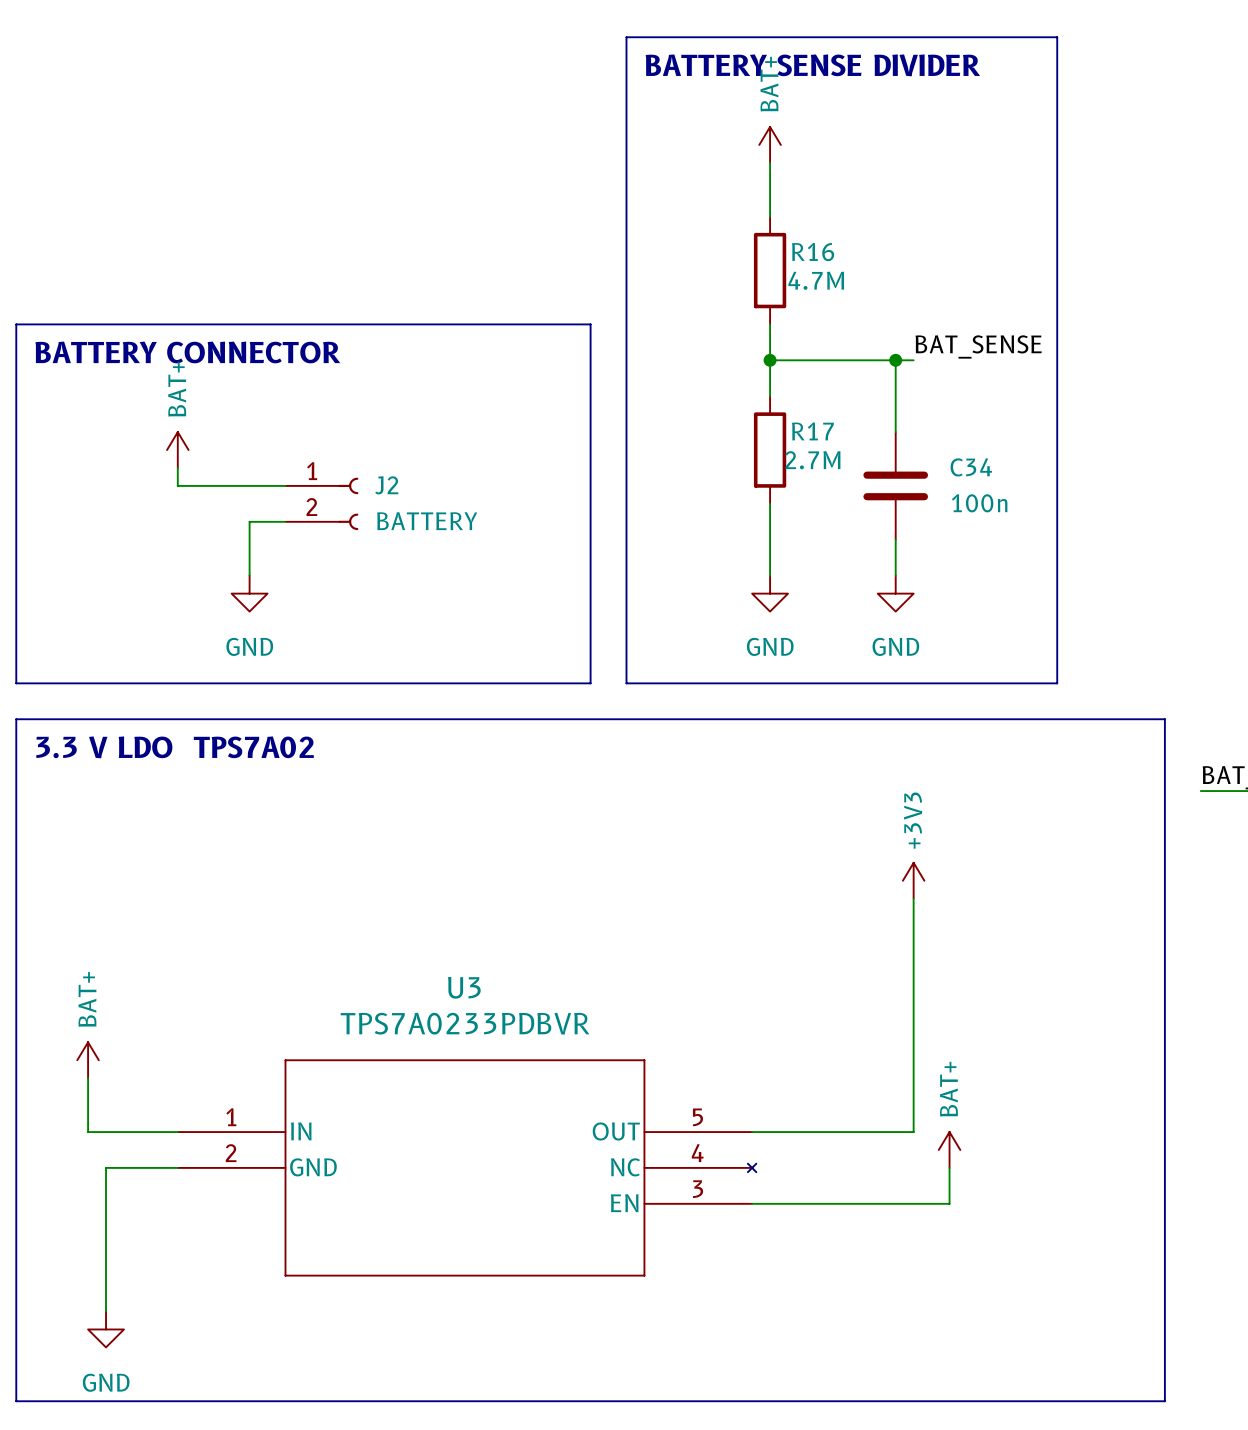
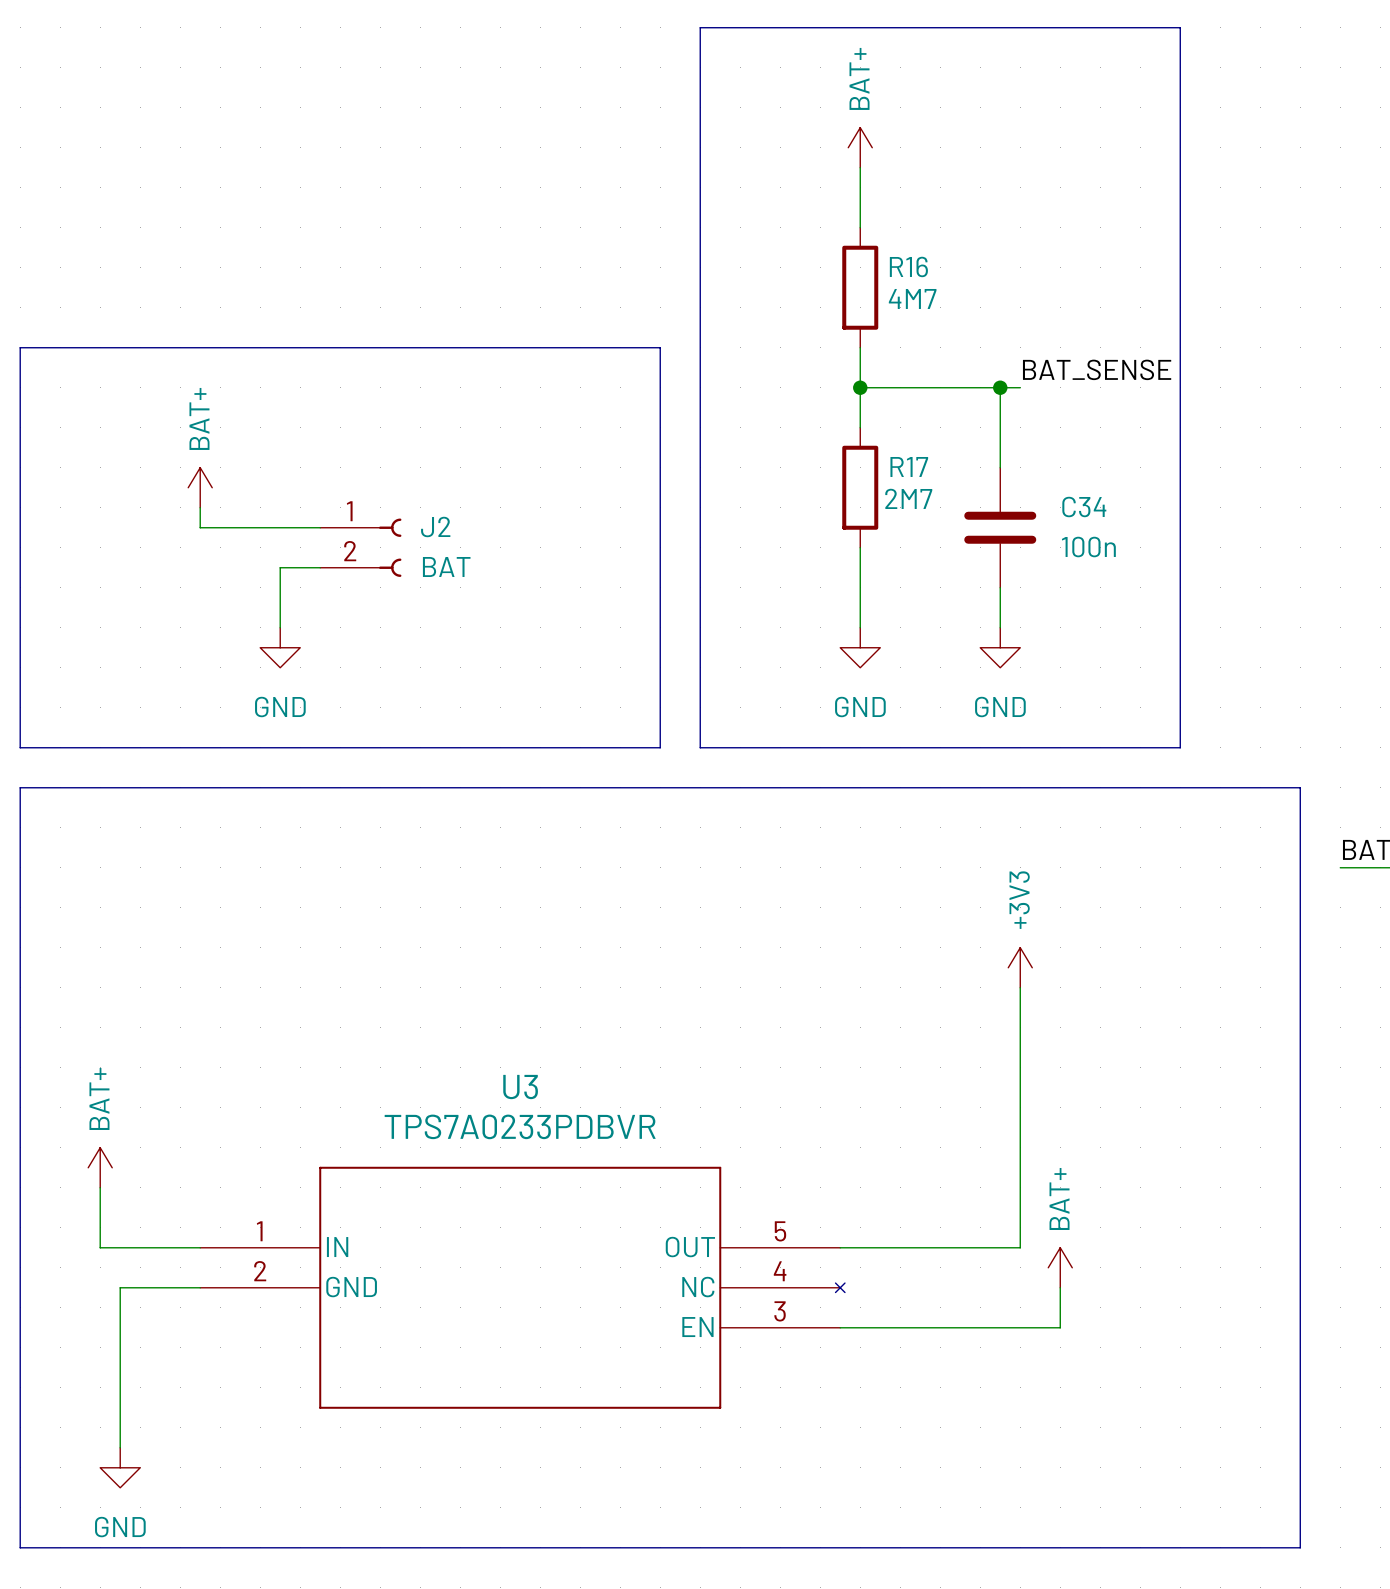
text: BATTERY SENSE DIVIDER (812, 65) -> none
R16 value: 4.7M (816, 280) -> 4M7 (912, 298)
text: BATTERY CONNECTOR (187, 352) -> none
R17 value: 2.7M (812, 460) -> 2M7 (908, 498)
J2 value: BATTERY (427, 521) -> BAT (446, 566)
text: 3.3 V LDO TPS7A02 (175, 747) -> none

